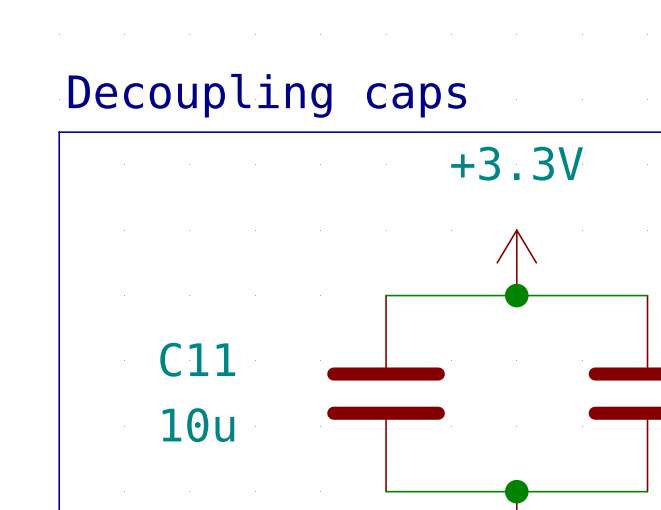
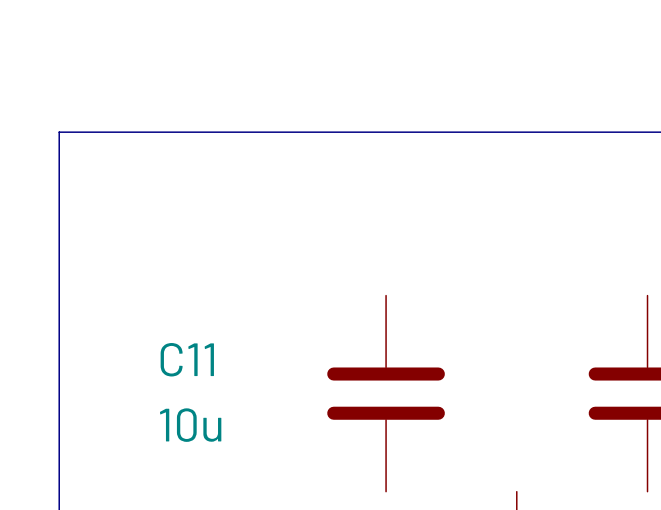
text: Decoupling caps (267, 95) -> none
power symbol: +3.3V (516, 262) -> none
wire: (386, 295) (647, 295) -> none
junction: (516, 295) -> none
wire: (386, 491) (647, 491) -> none
junction: (516, 491) -> none

